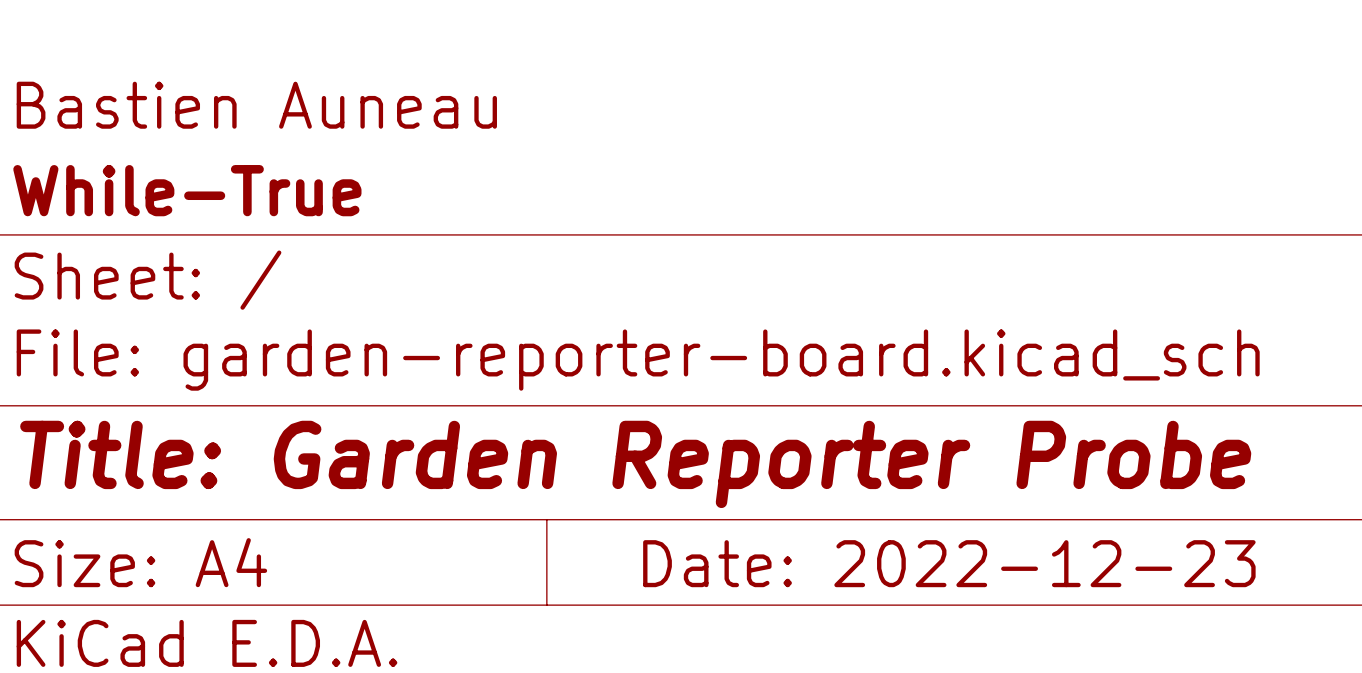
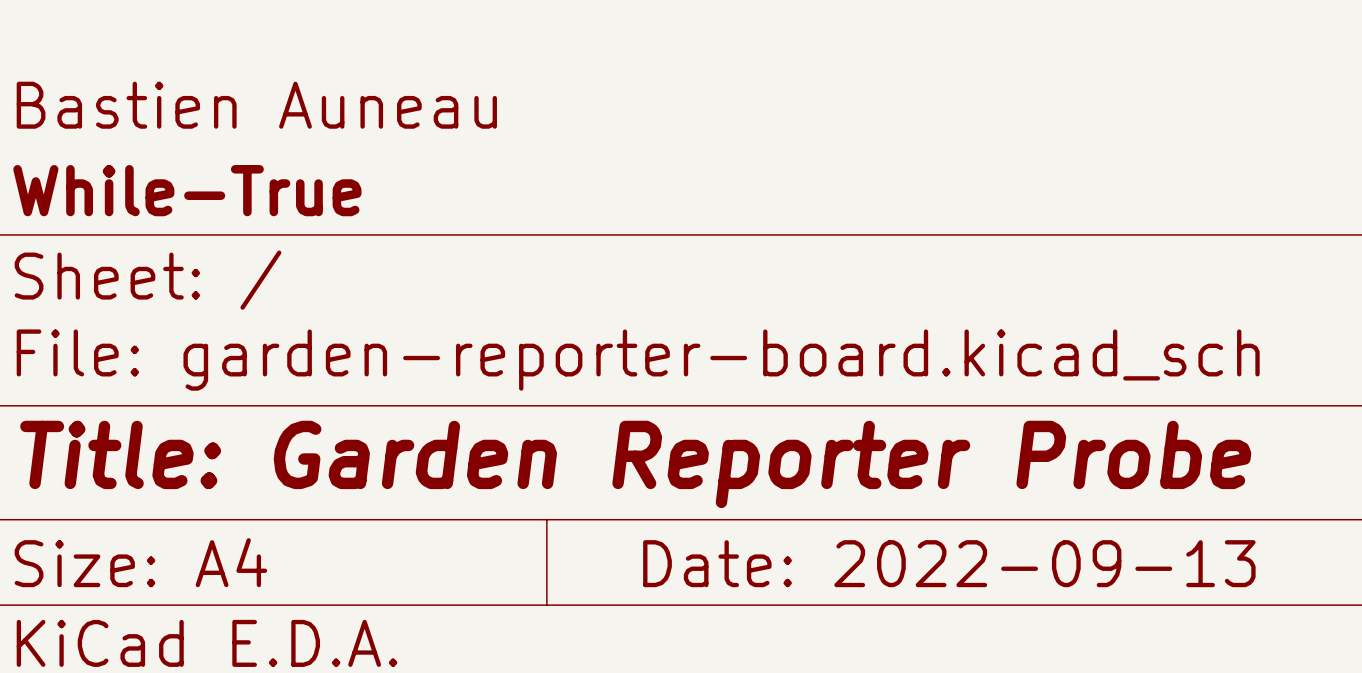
title block: Date: 2022-12-23 (949, 563) -> Date: 2022-09-13 (949, 563)

